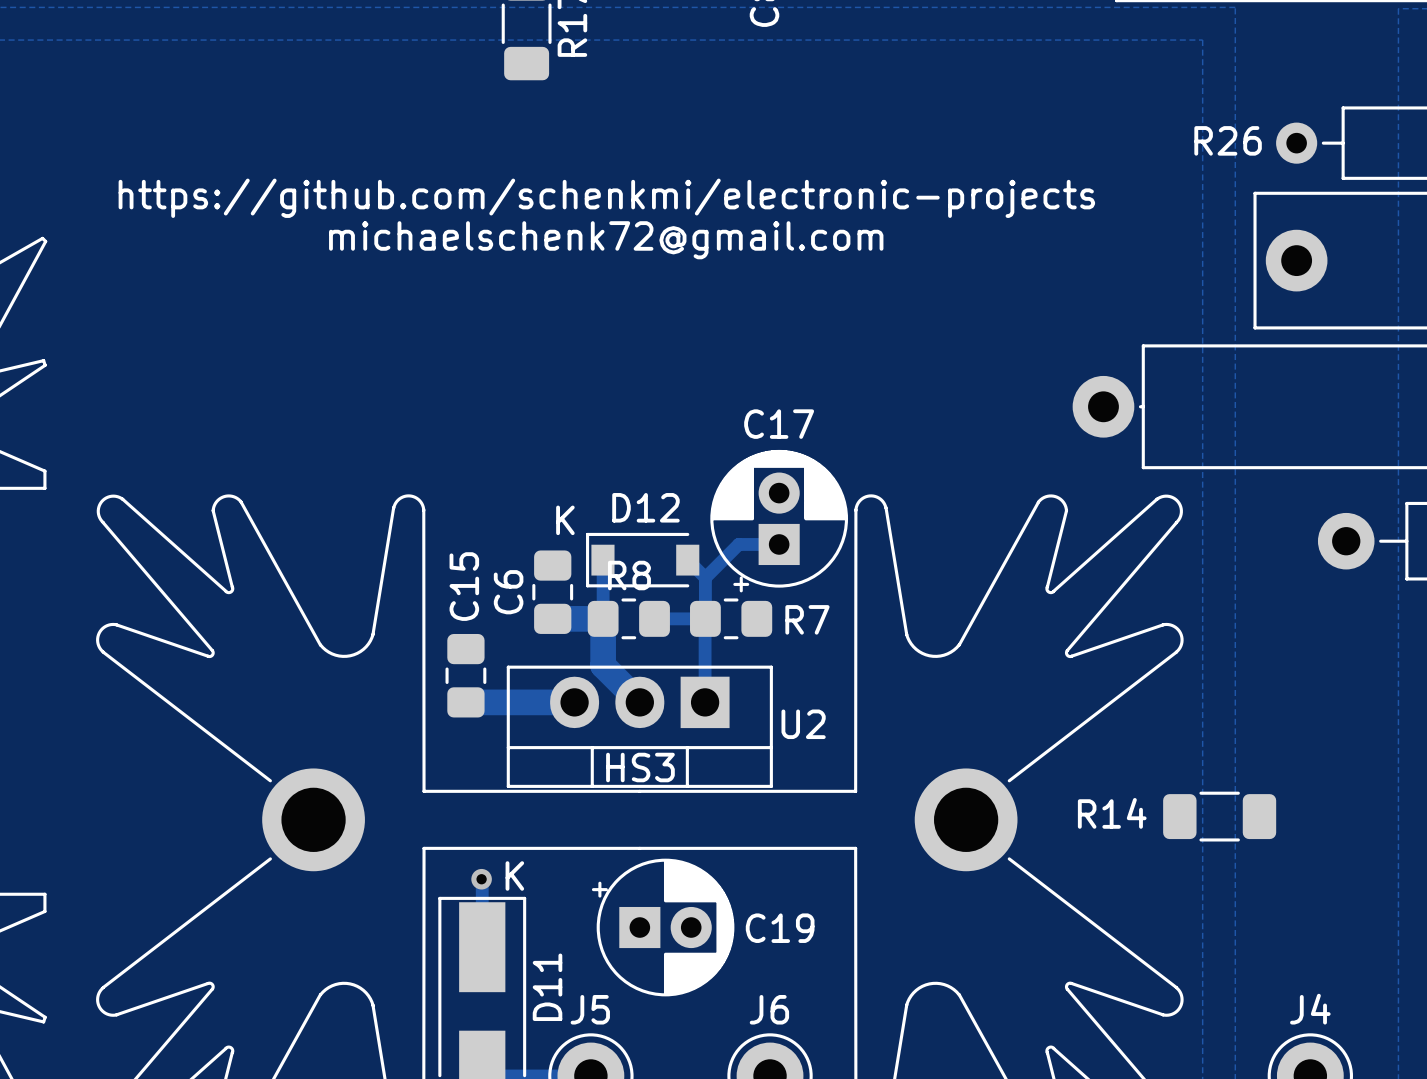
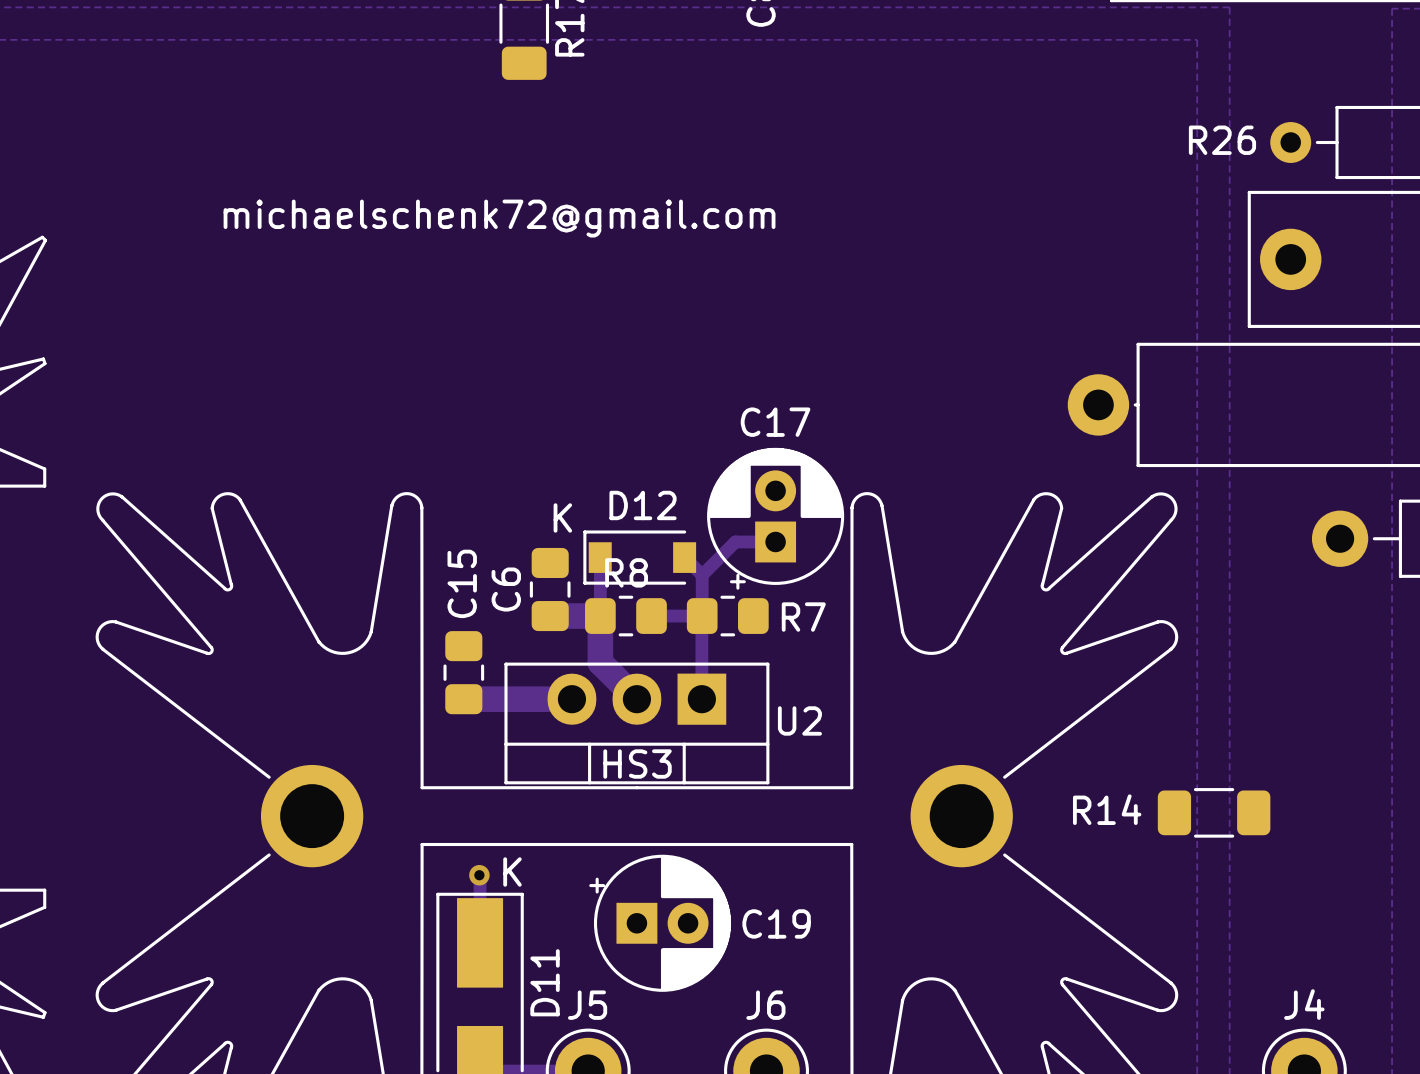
text: https://github.com/schenkmi/electronic-projects (606, 198) -> none
text position: michaelschenk72@gmail.com (606, 240) -> michaelschenk72@gmail.com (499, 218)

